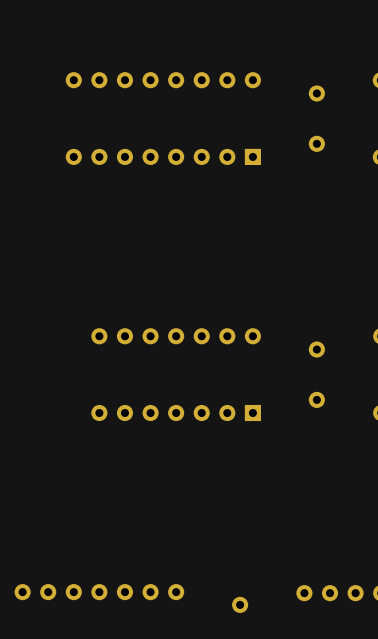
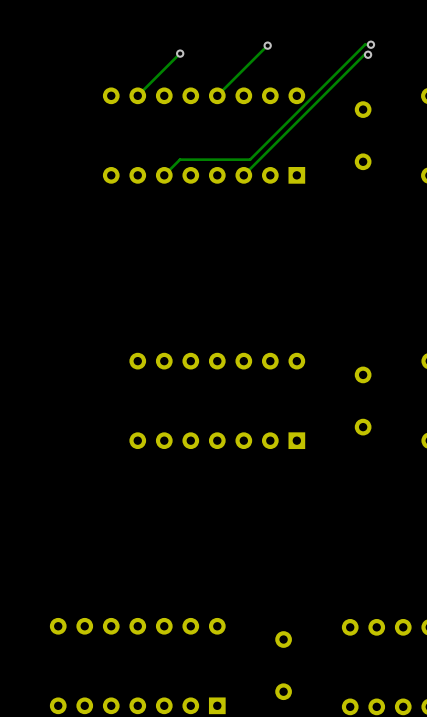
track: none -> (370, 44) (365, 44) (250, 159) (179, 159) (164, 175)
via: none -> (370, 44)
track: none -> (267, 45) (217, 95)
via: none -> (267, 45)
track: none -> (180, 53) (137, 95)
via: none -> (180, 53)
track: none -> (368, 54) (364, 54) (243, 175)
via: none -> (368, 54)

